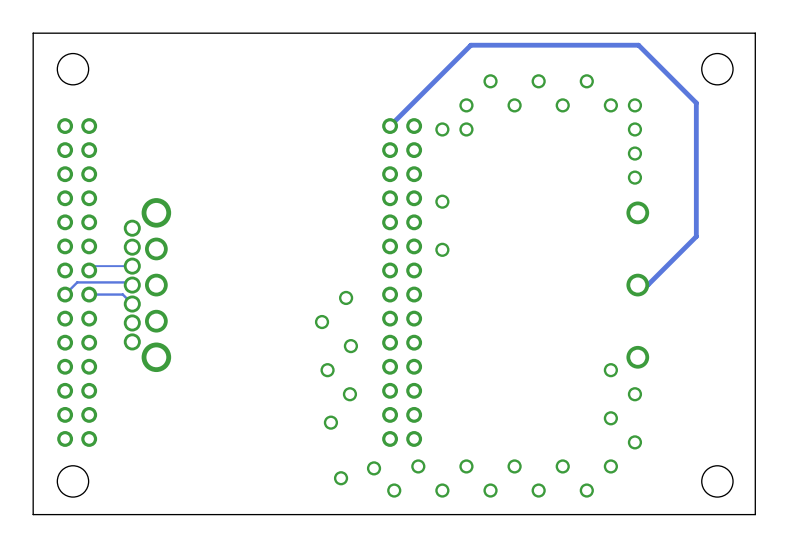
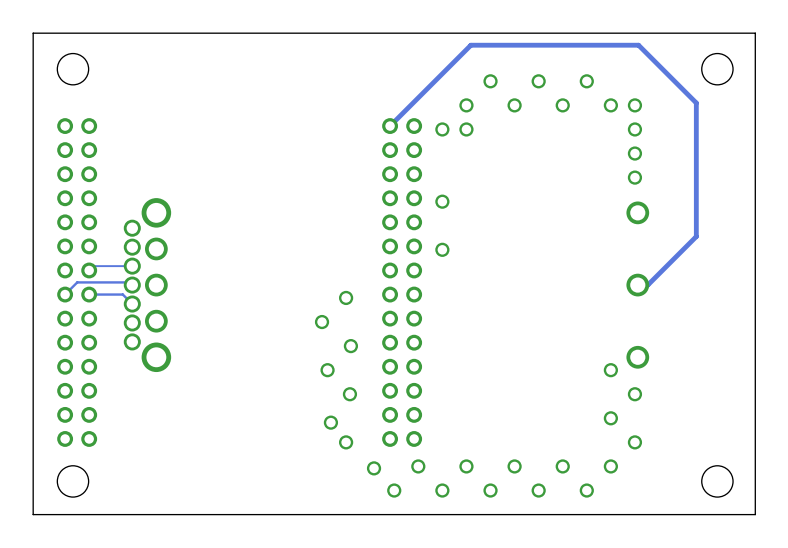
via position: (341, 478) -> (346, 442)

